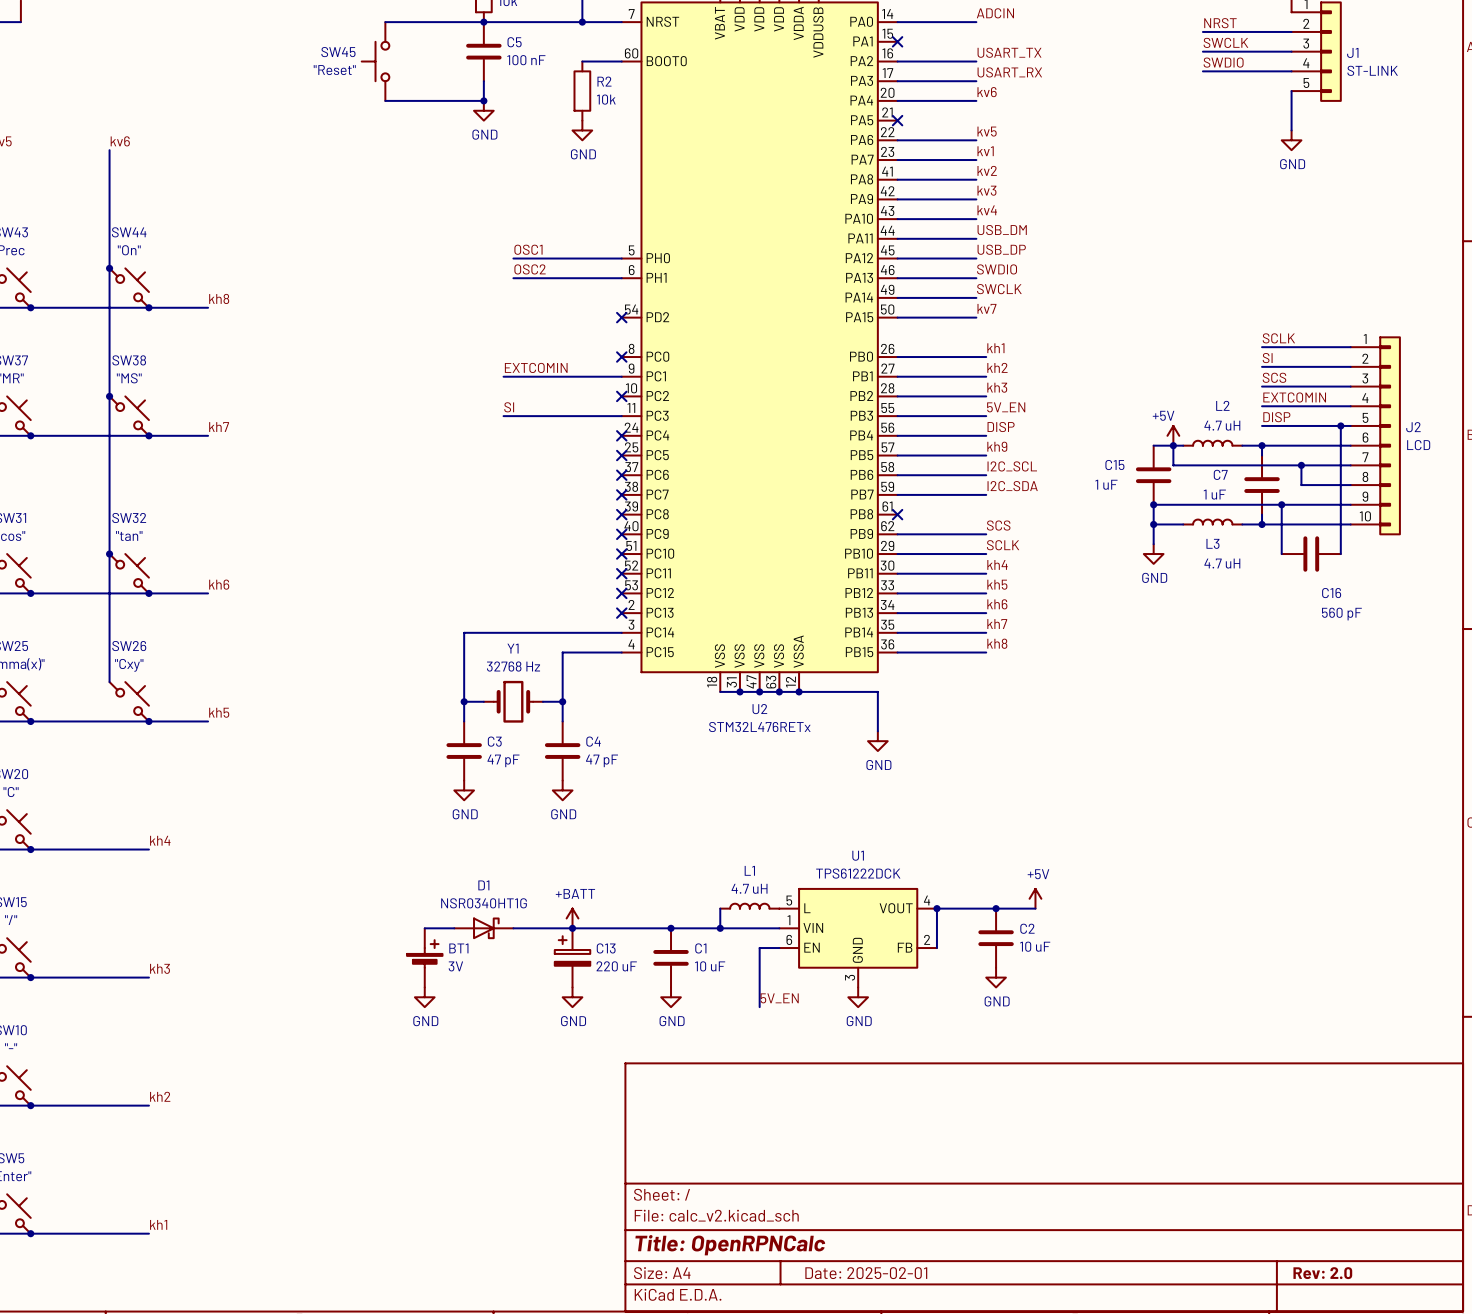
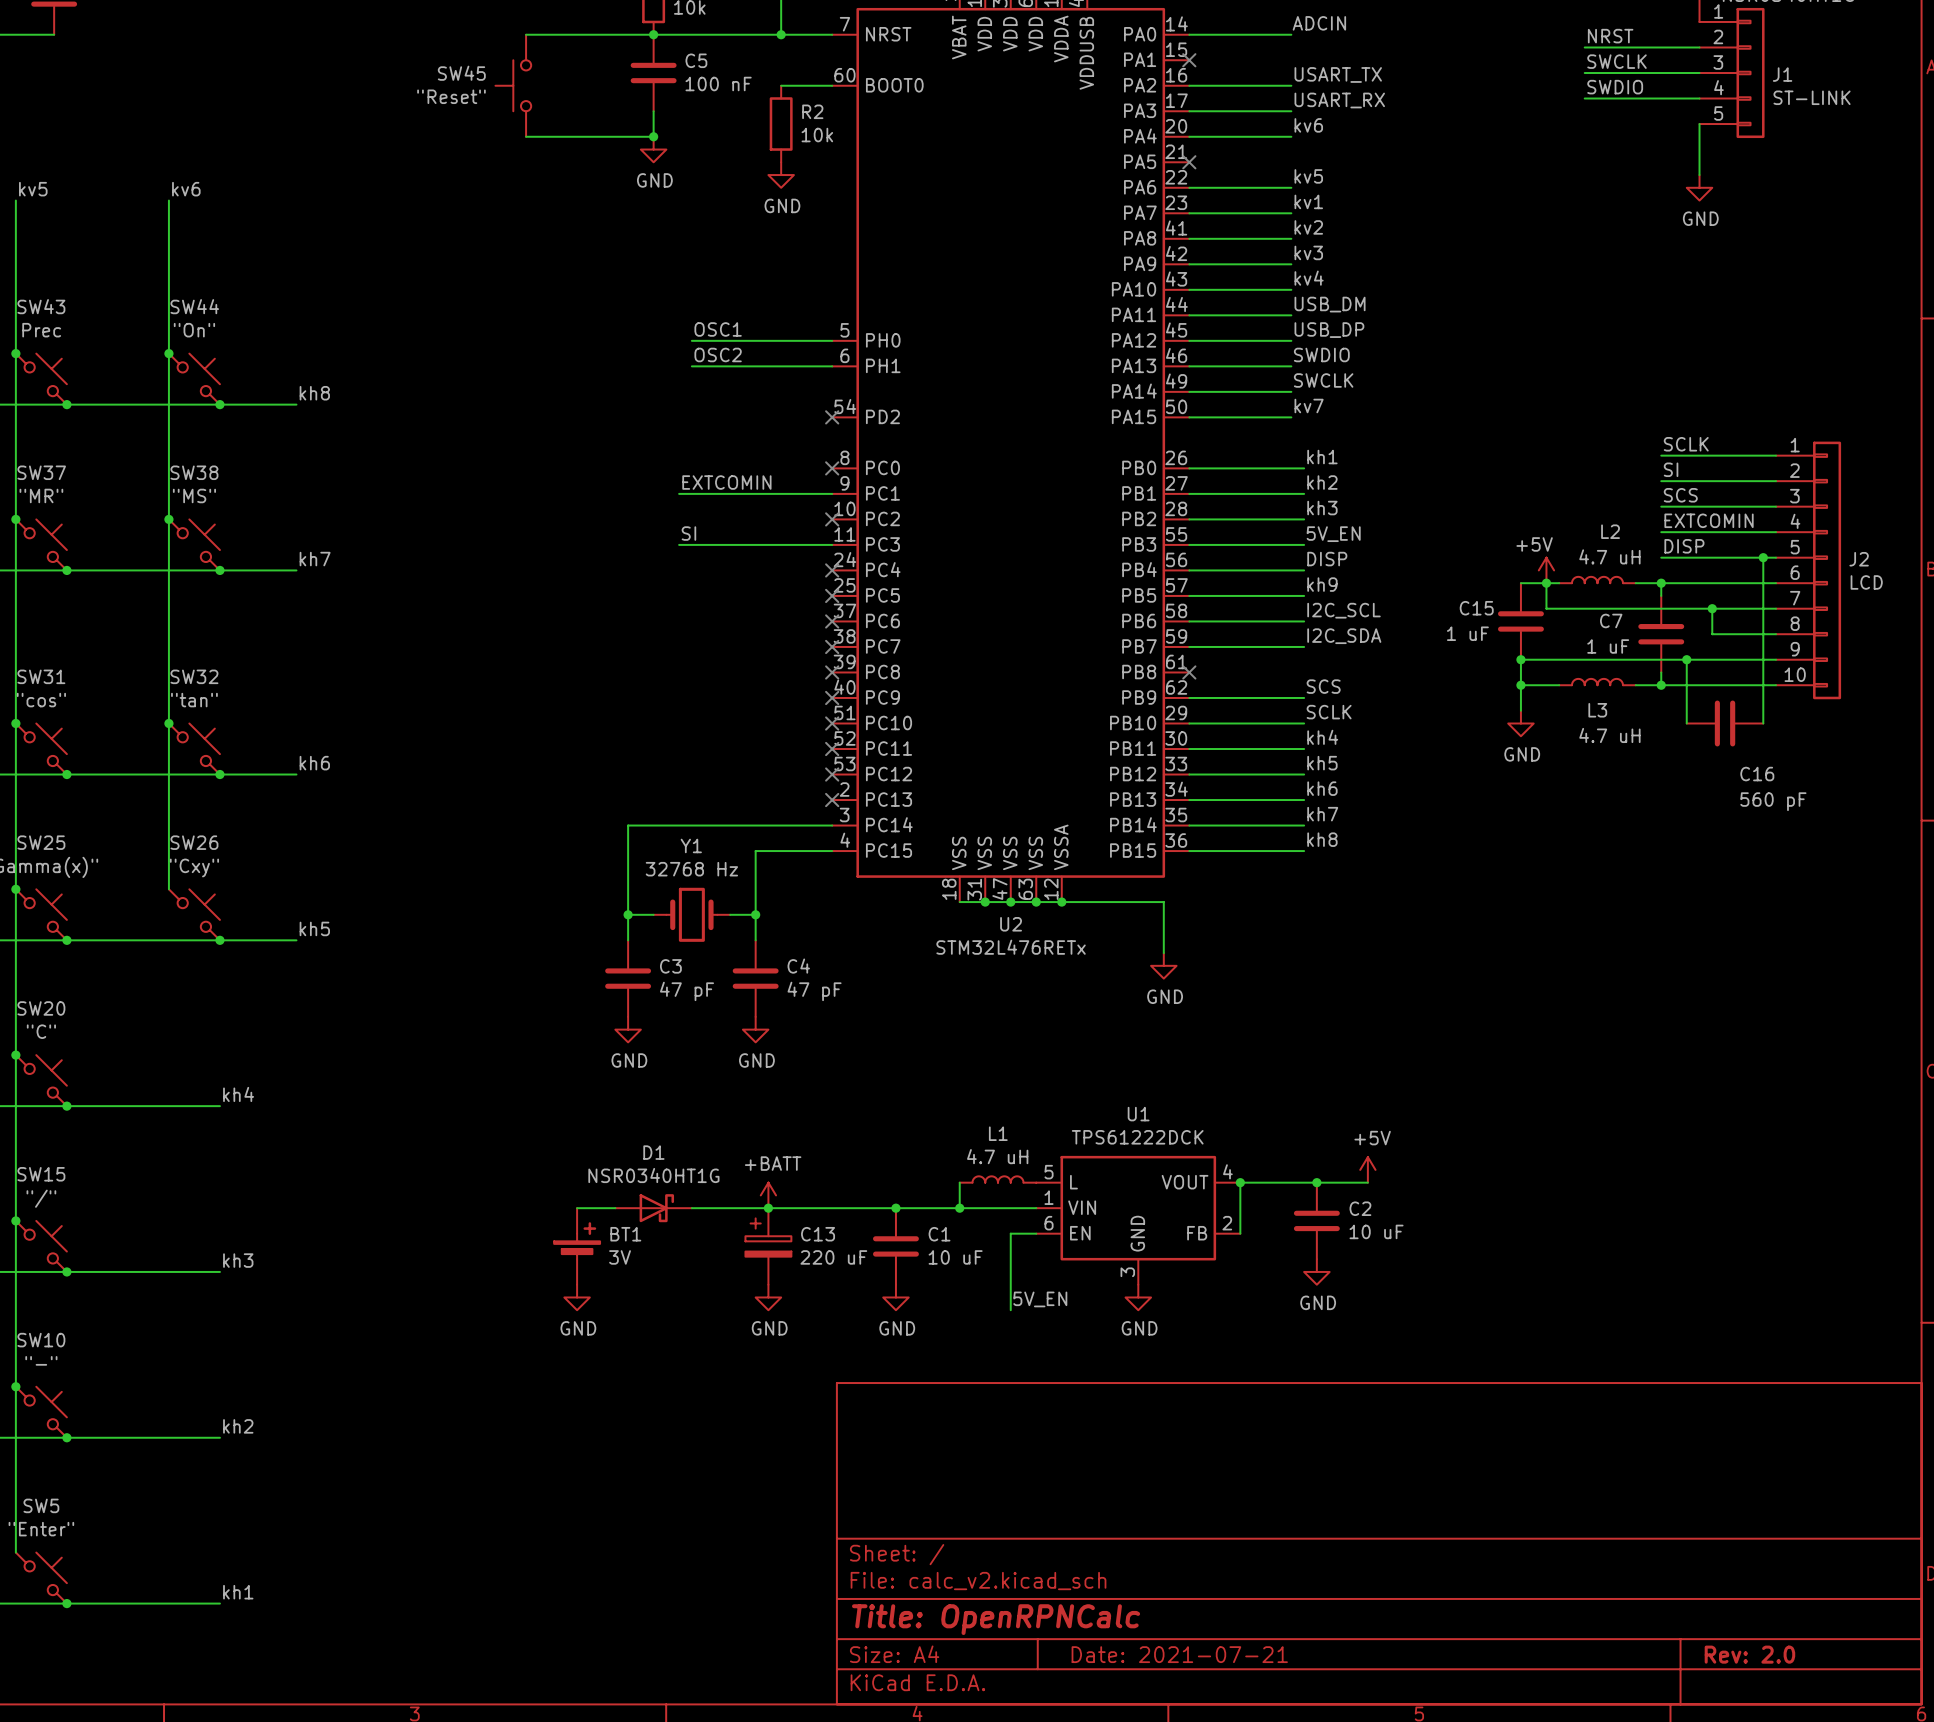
title block: Date: 2025-02-01 (866, 1273) -> Date: 2021-07-21 (1179, 1654)

